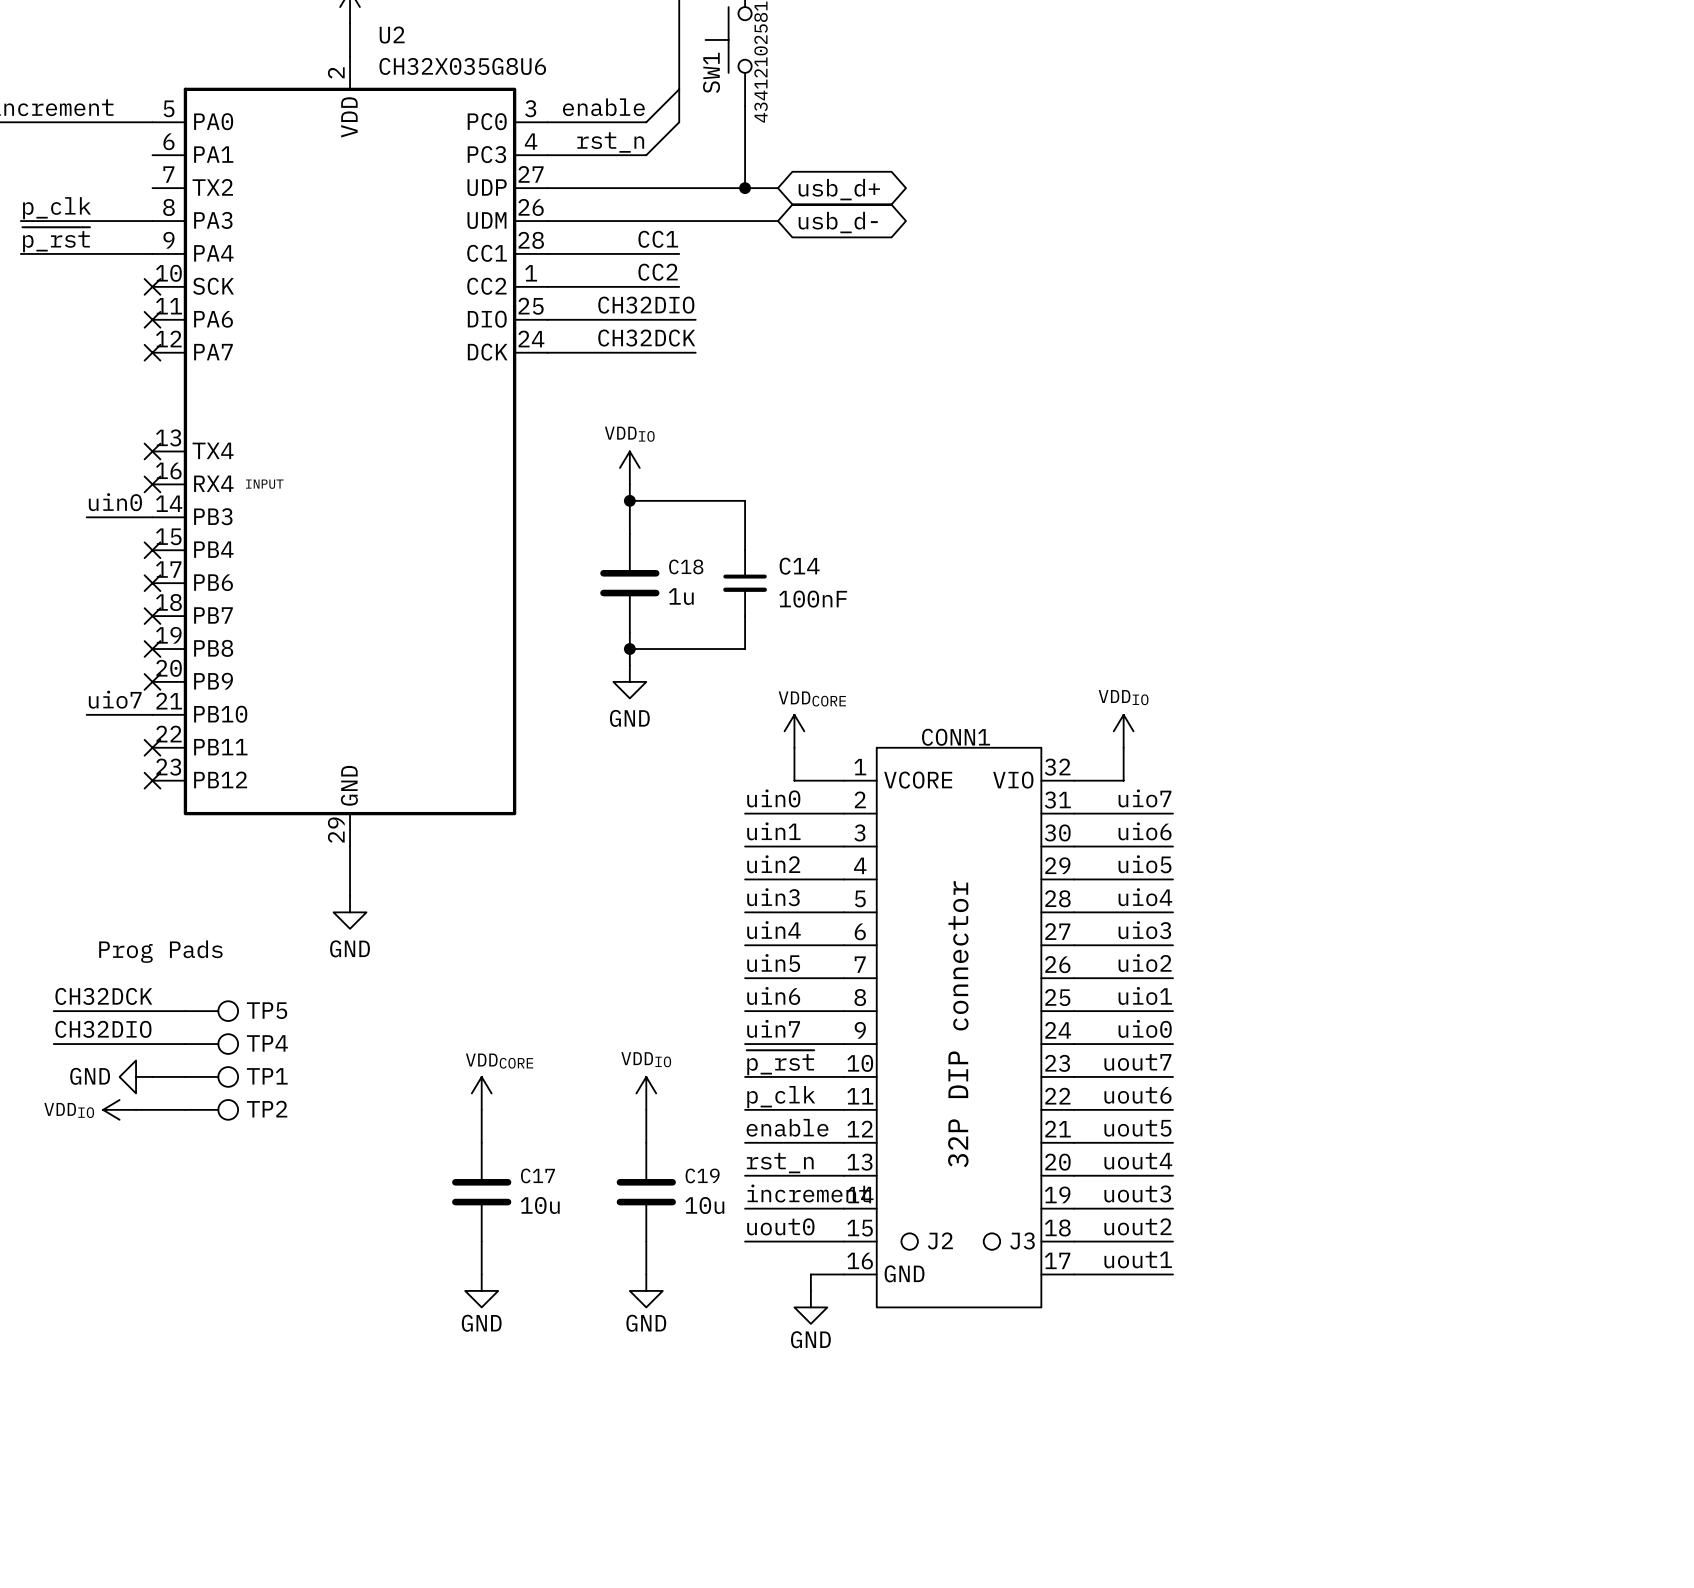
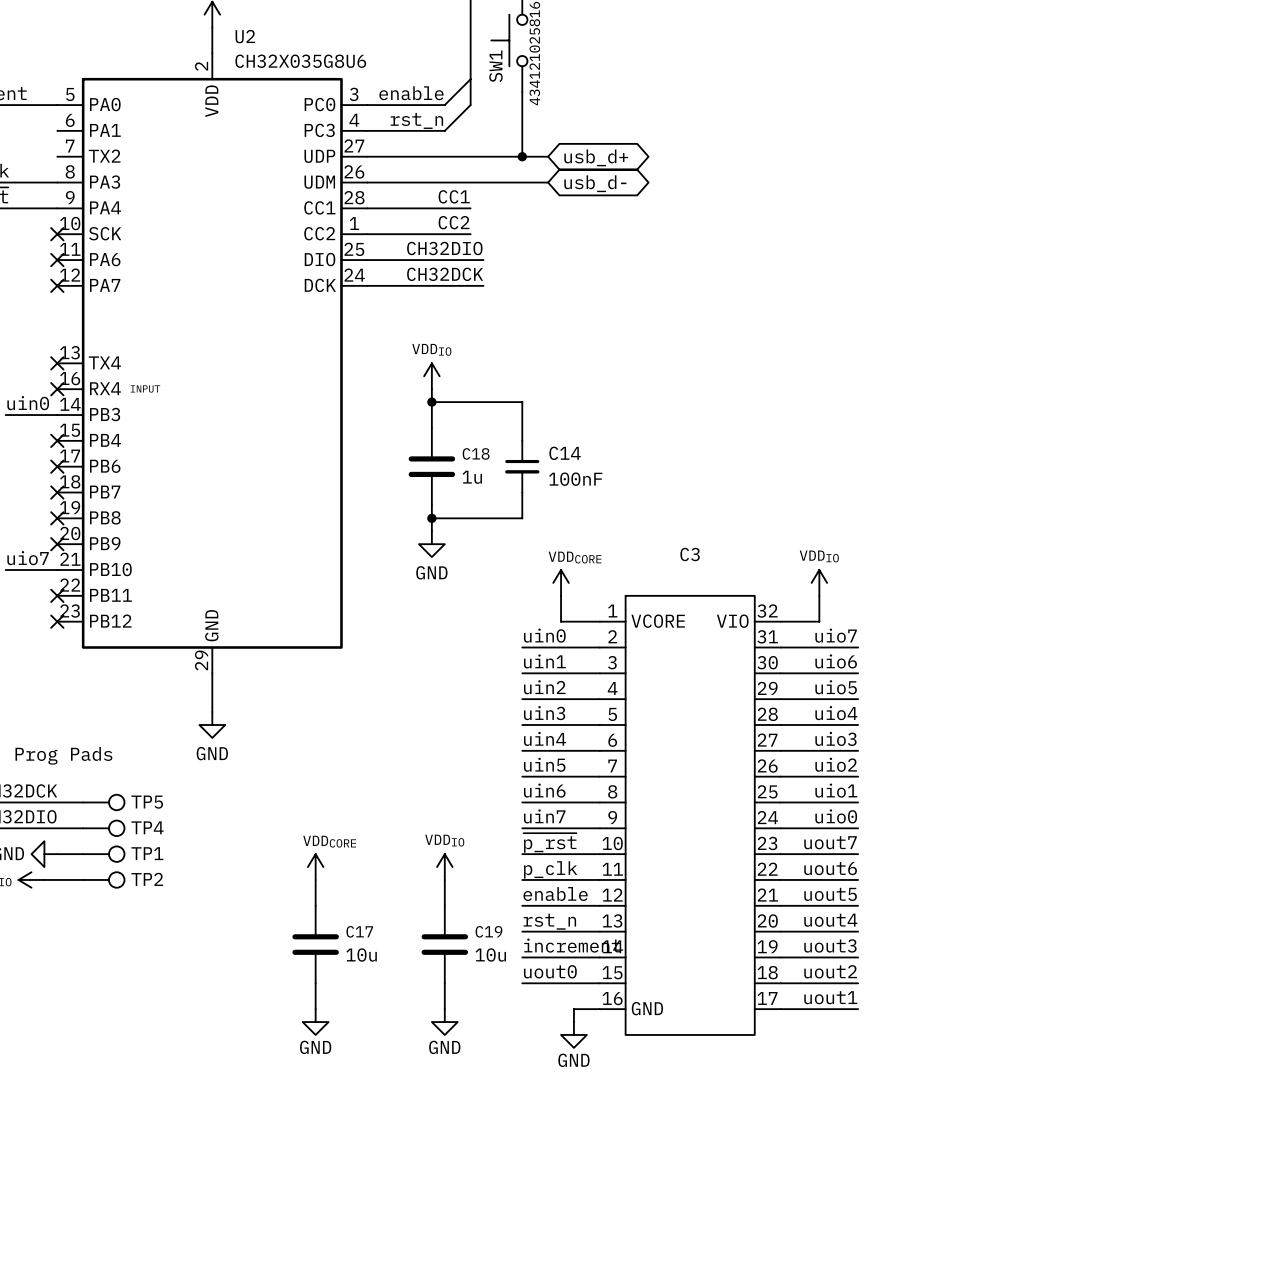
CONN1 name: CONN1 (956, 737) -> C3 (690, 554)
text: 32P DIP connector (958, 1024) -> none
J2: (909, 1241) -> none
J3: (991, 1241) -> none

